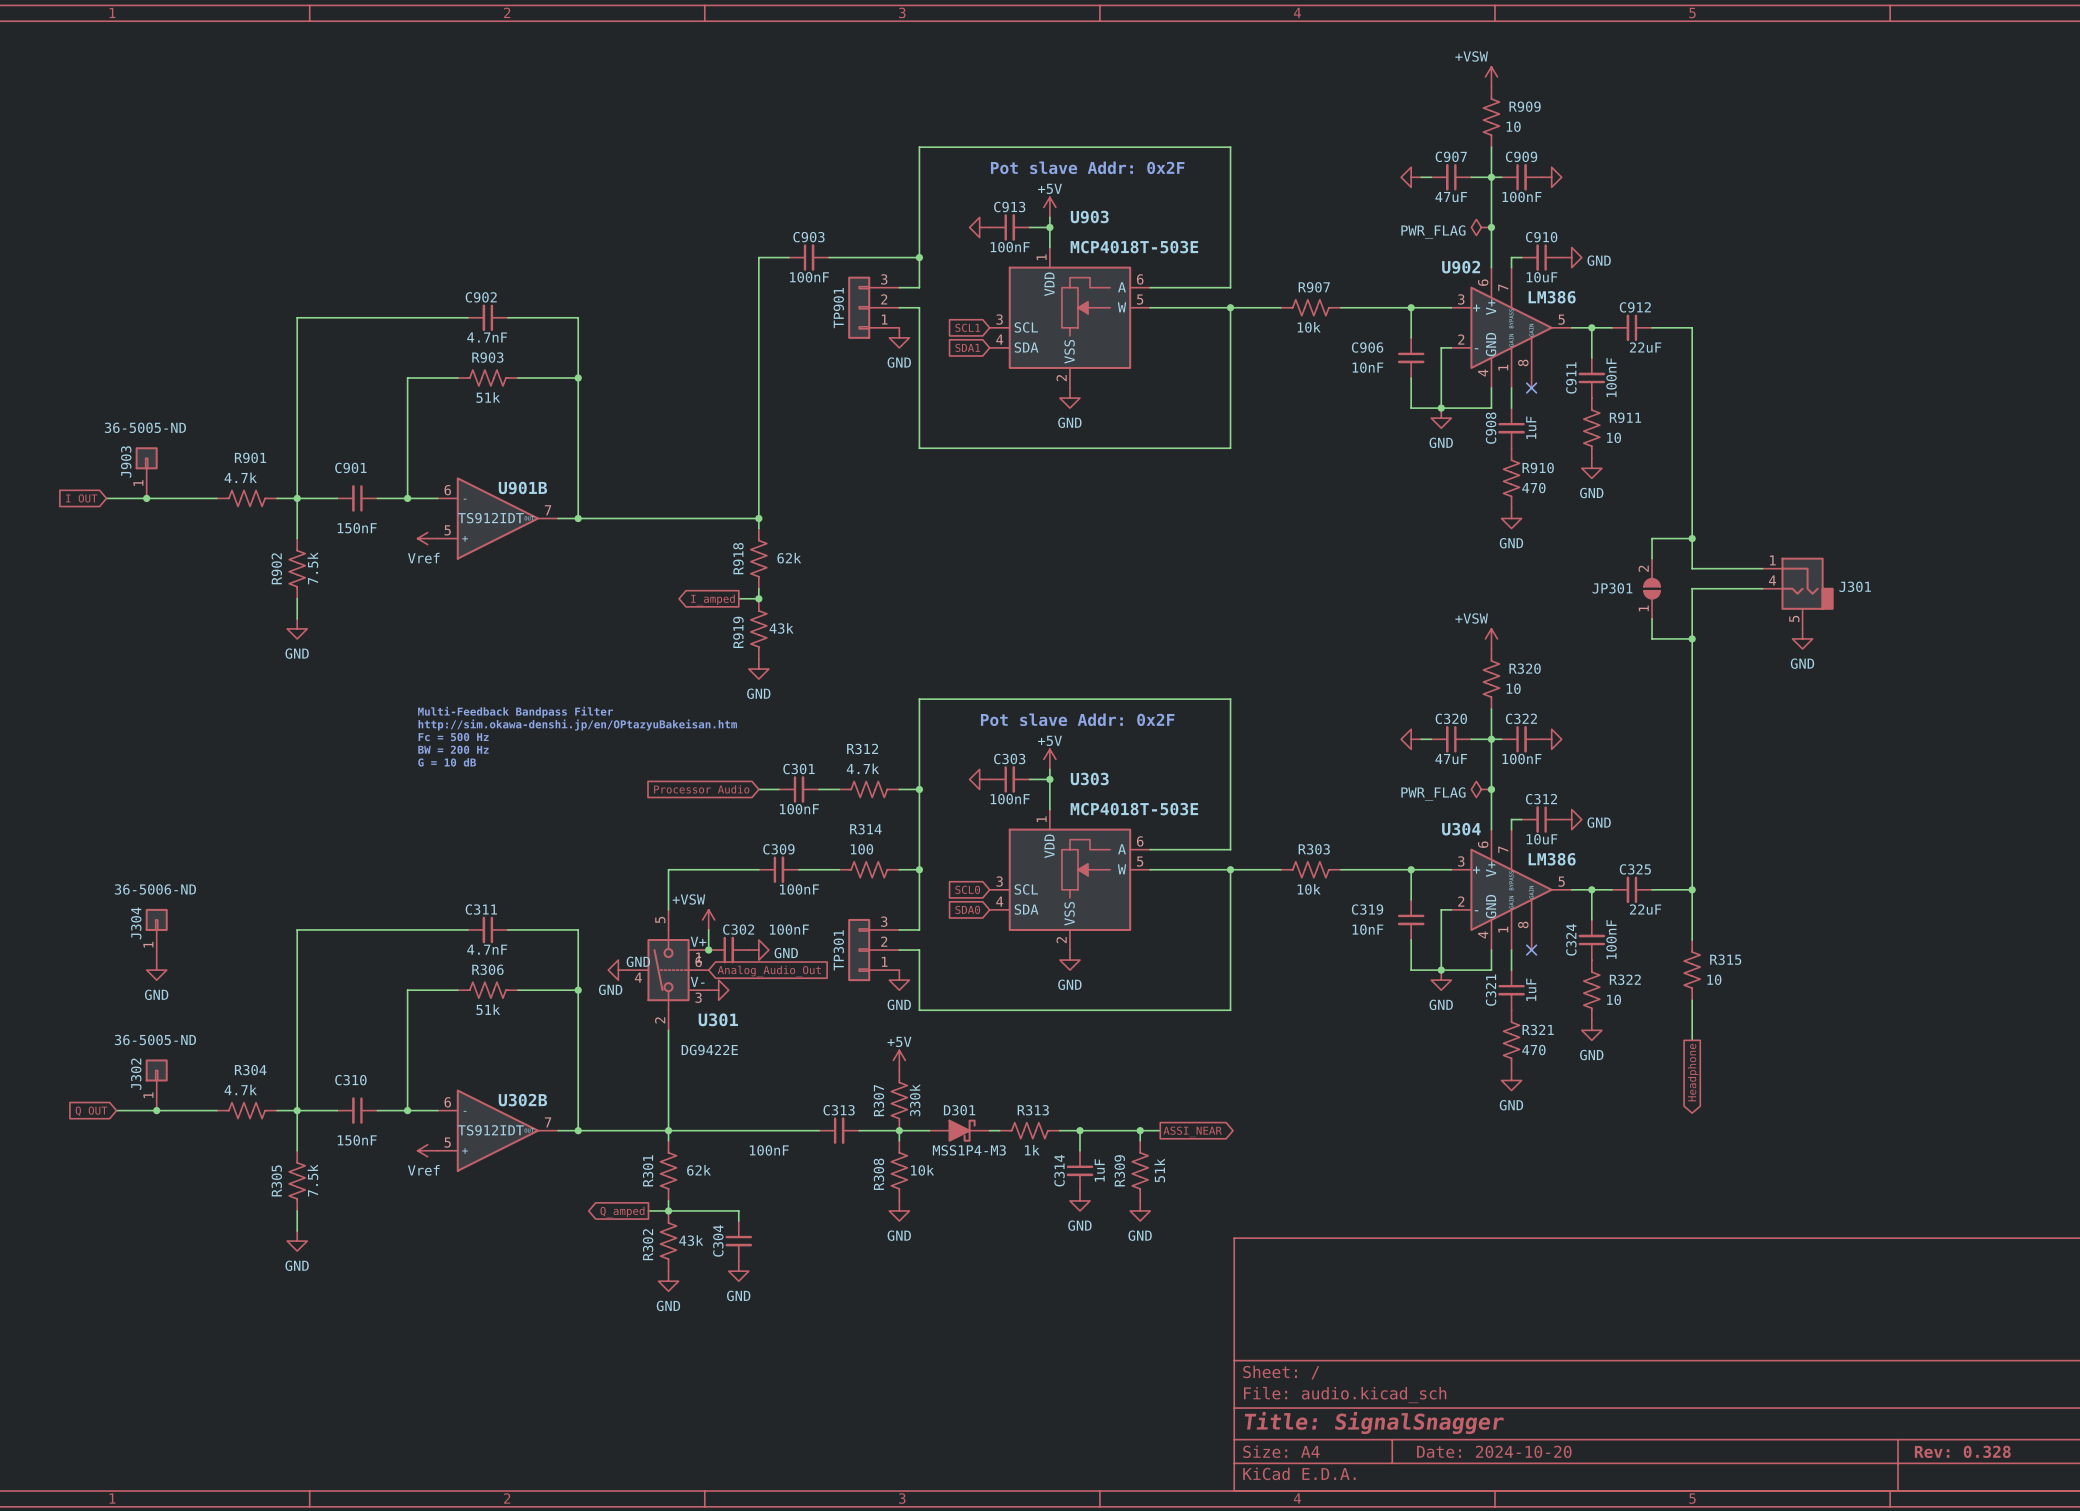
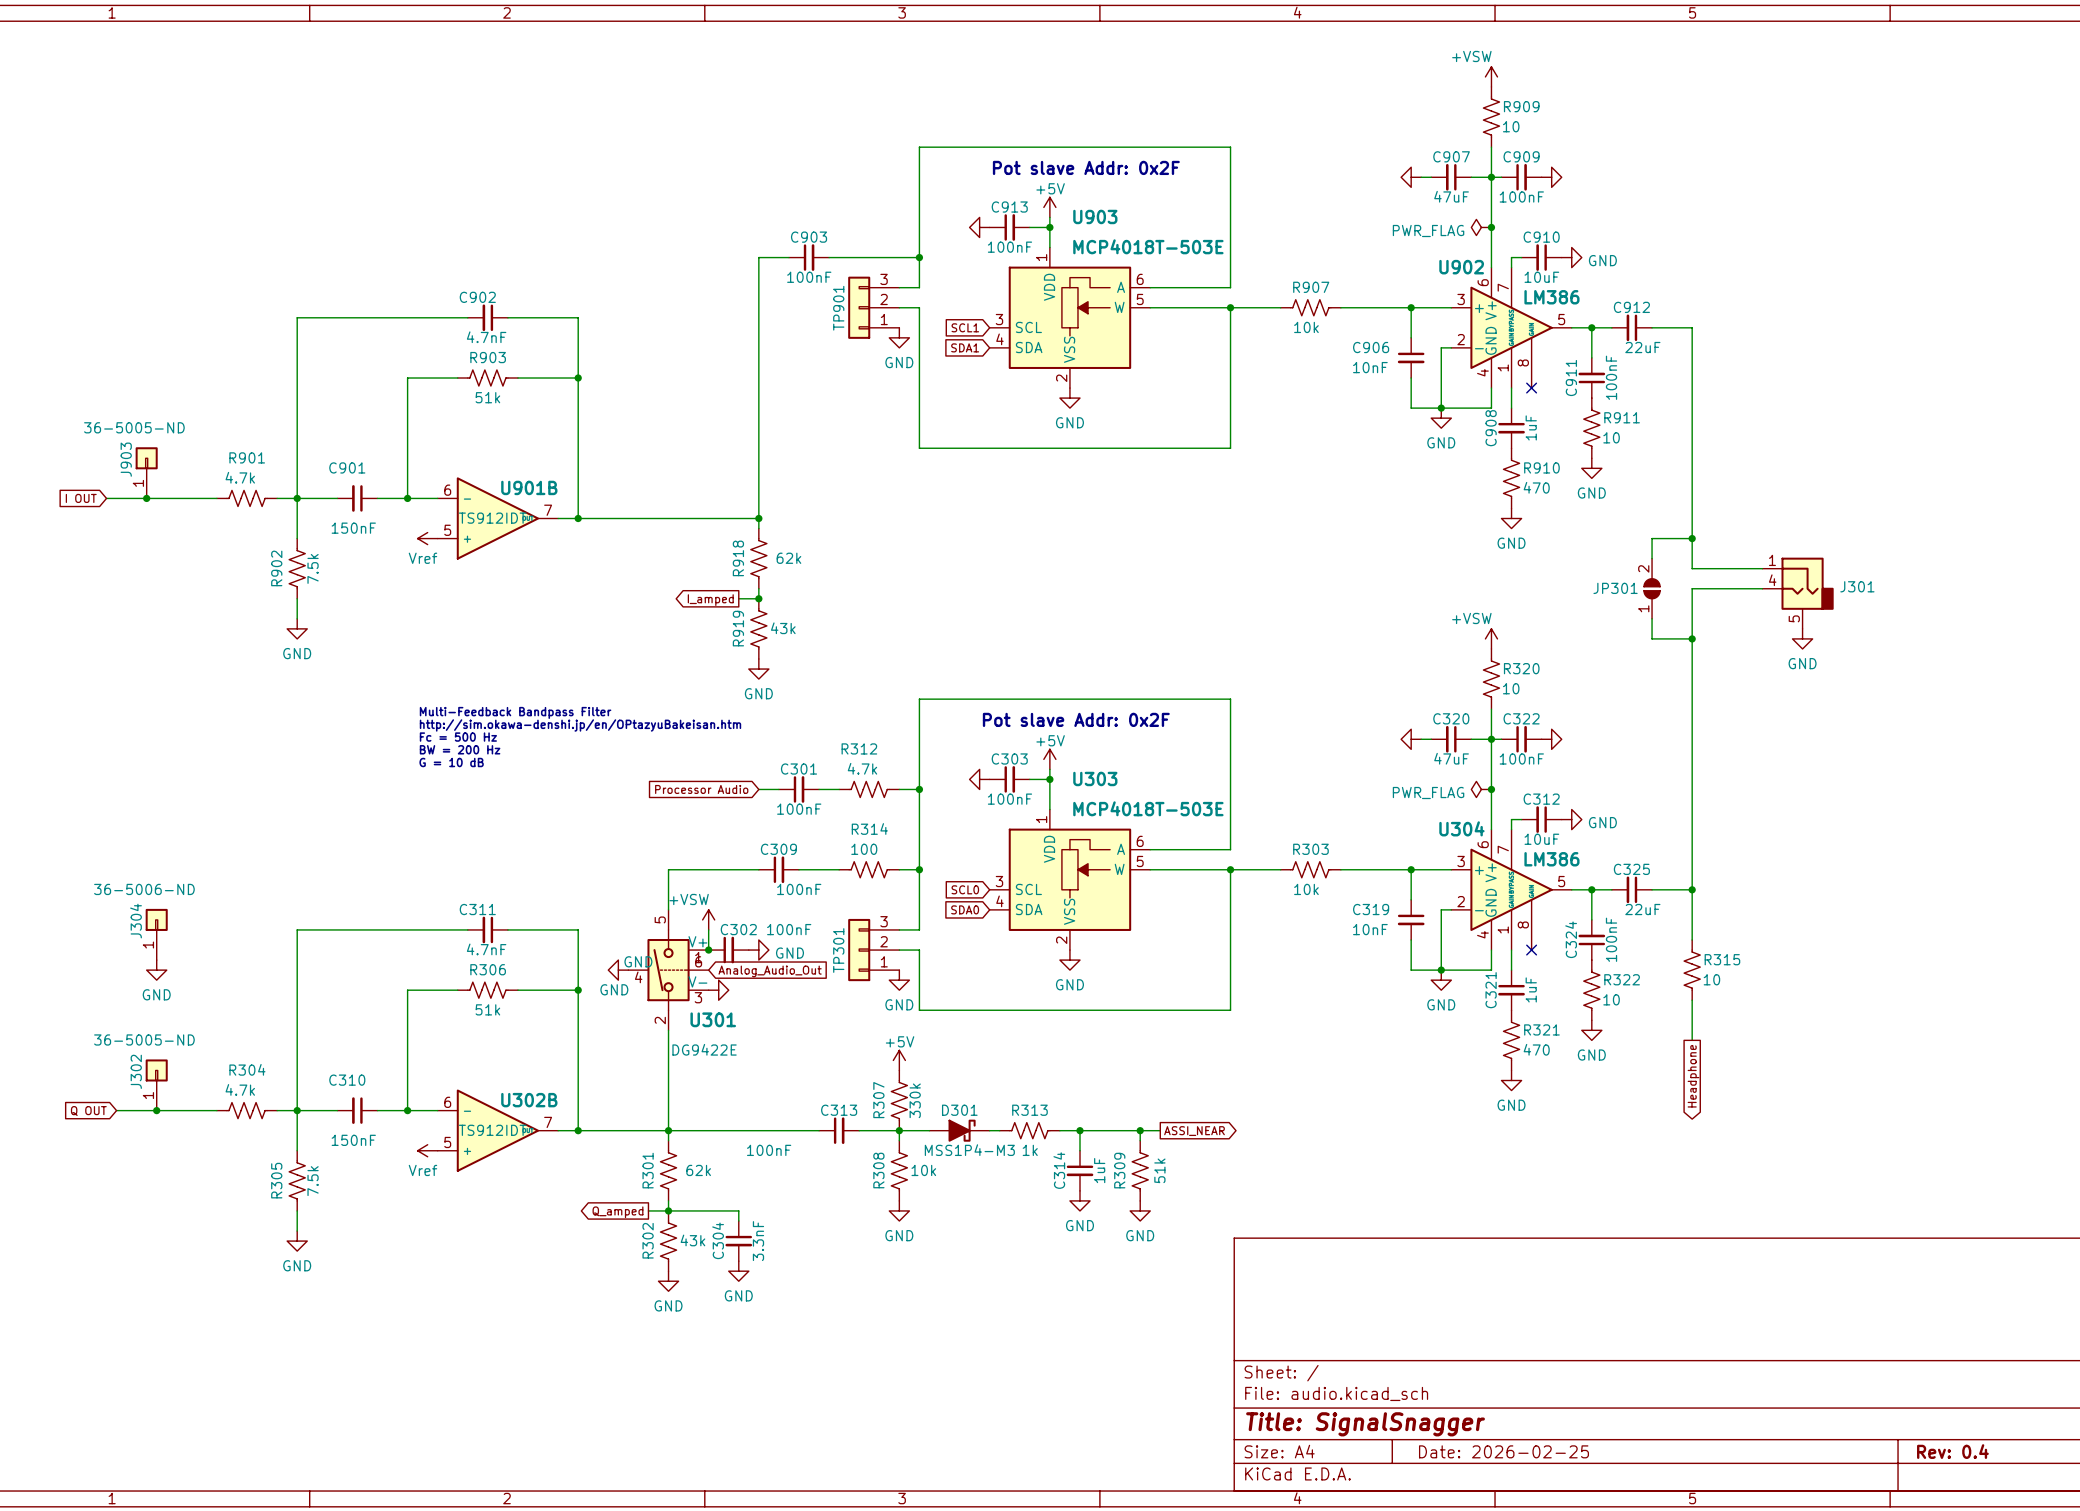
C304 value: none -> 3.3nF (758, 1241)
title block: Date: 2024-10-20 (1494, 1451) -> Date: 2026-02-25 (1503, 1451)
title block: Rev: 0.328 (1962, 1451) -> Rev: 0.4 (1952, 1451)

